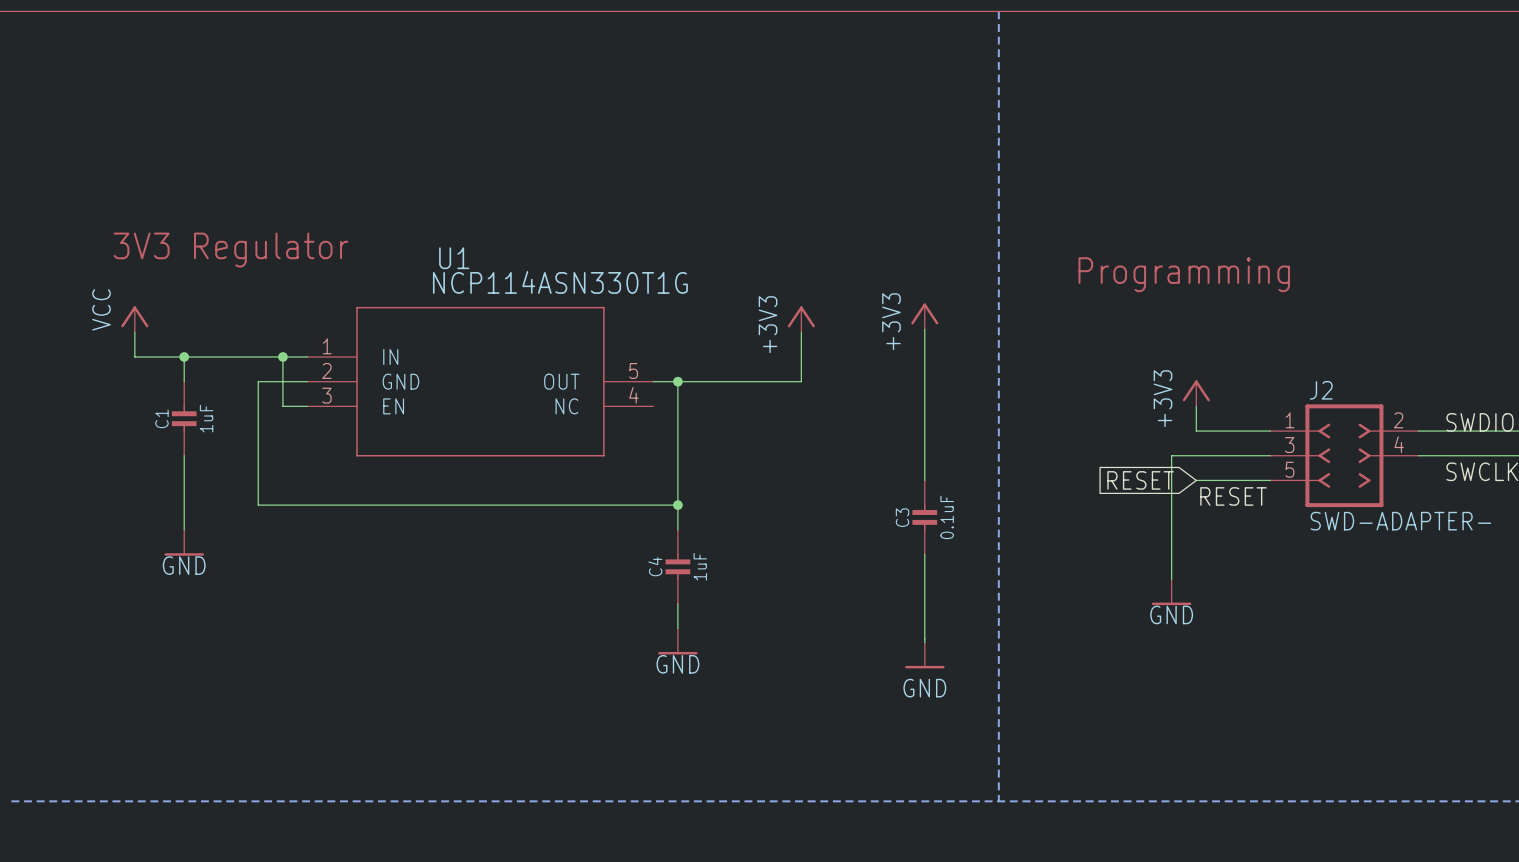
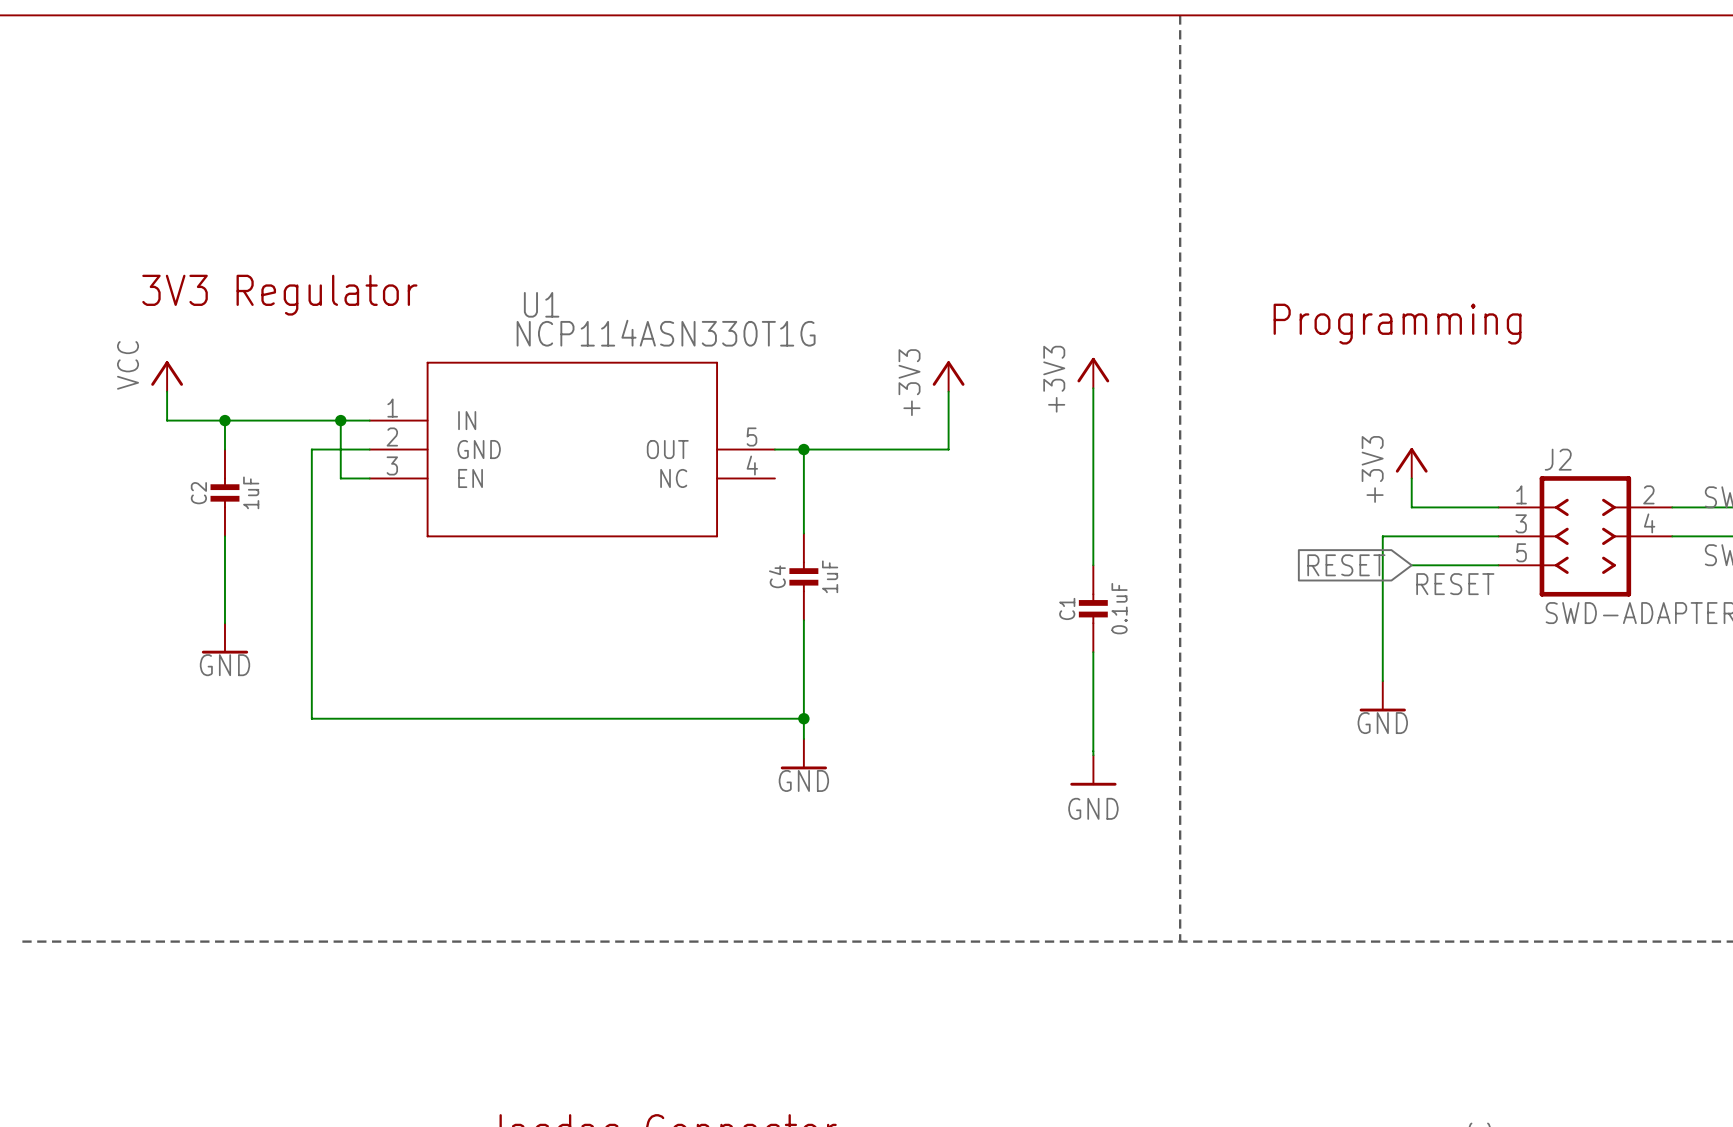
C1 name: C1 (161, 418) -> C2 (198, 493)
wire: (258, 505) (677, 505) -> (311, 594) (311, 718) (803, 718)
junction: (677, 505) -> none
C3 name: C3 (902, 517) -> C1 (1067, 608)
C4 position: (677, 566) -> (803, 576)
junction: none -> (803, 718)

